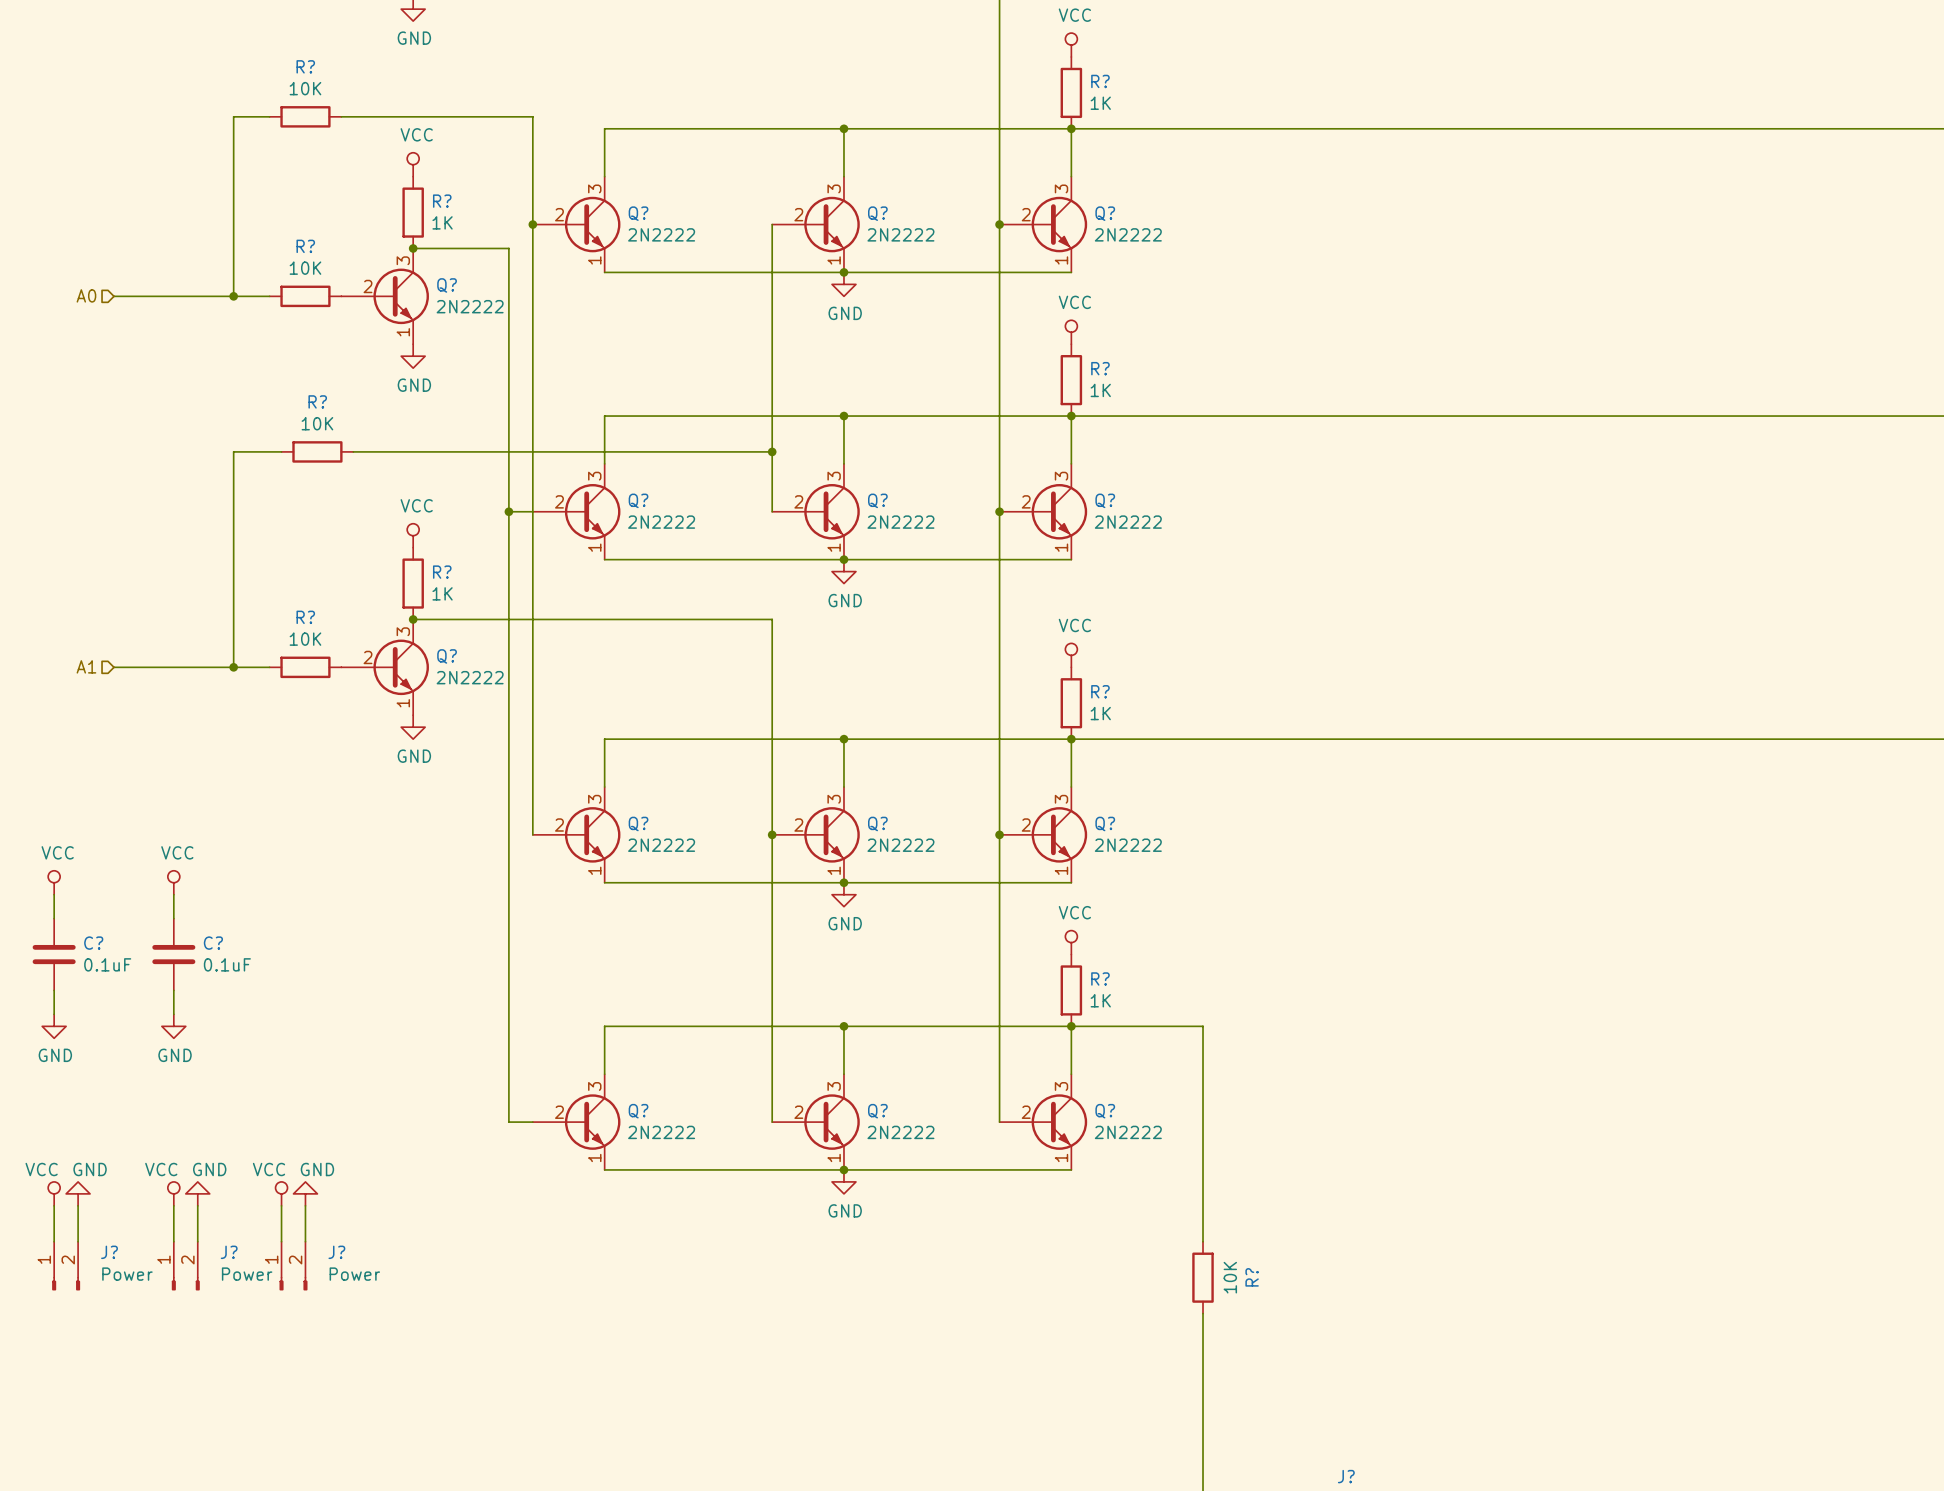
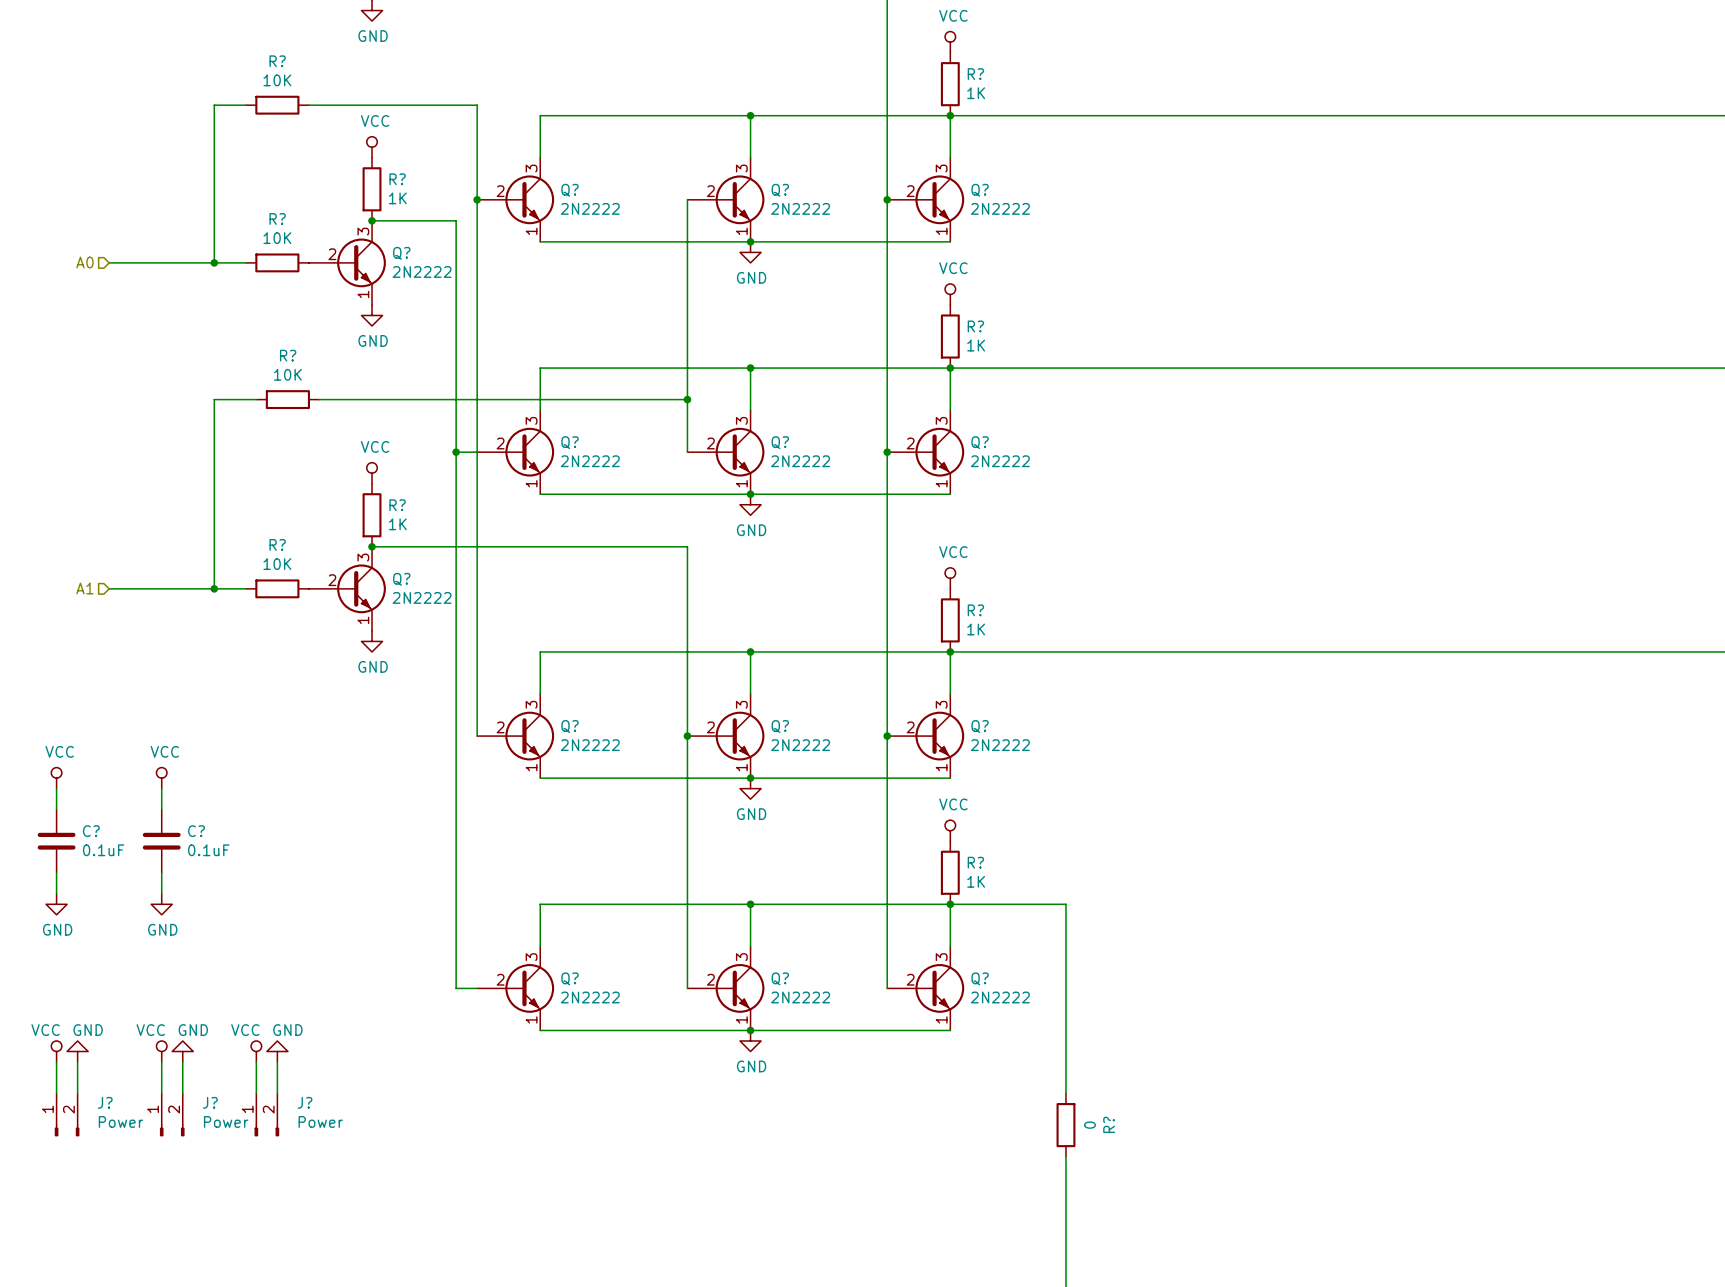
R? value: 10K (1230, 1277) -> 0 (1089, 1125)

